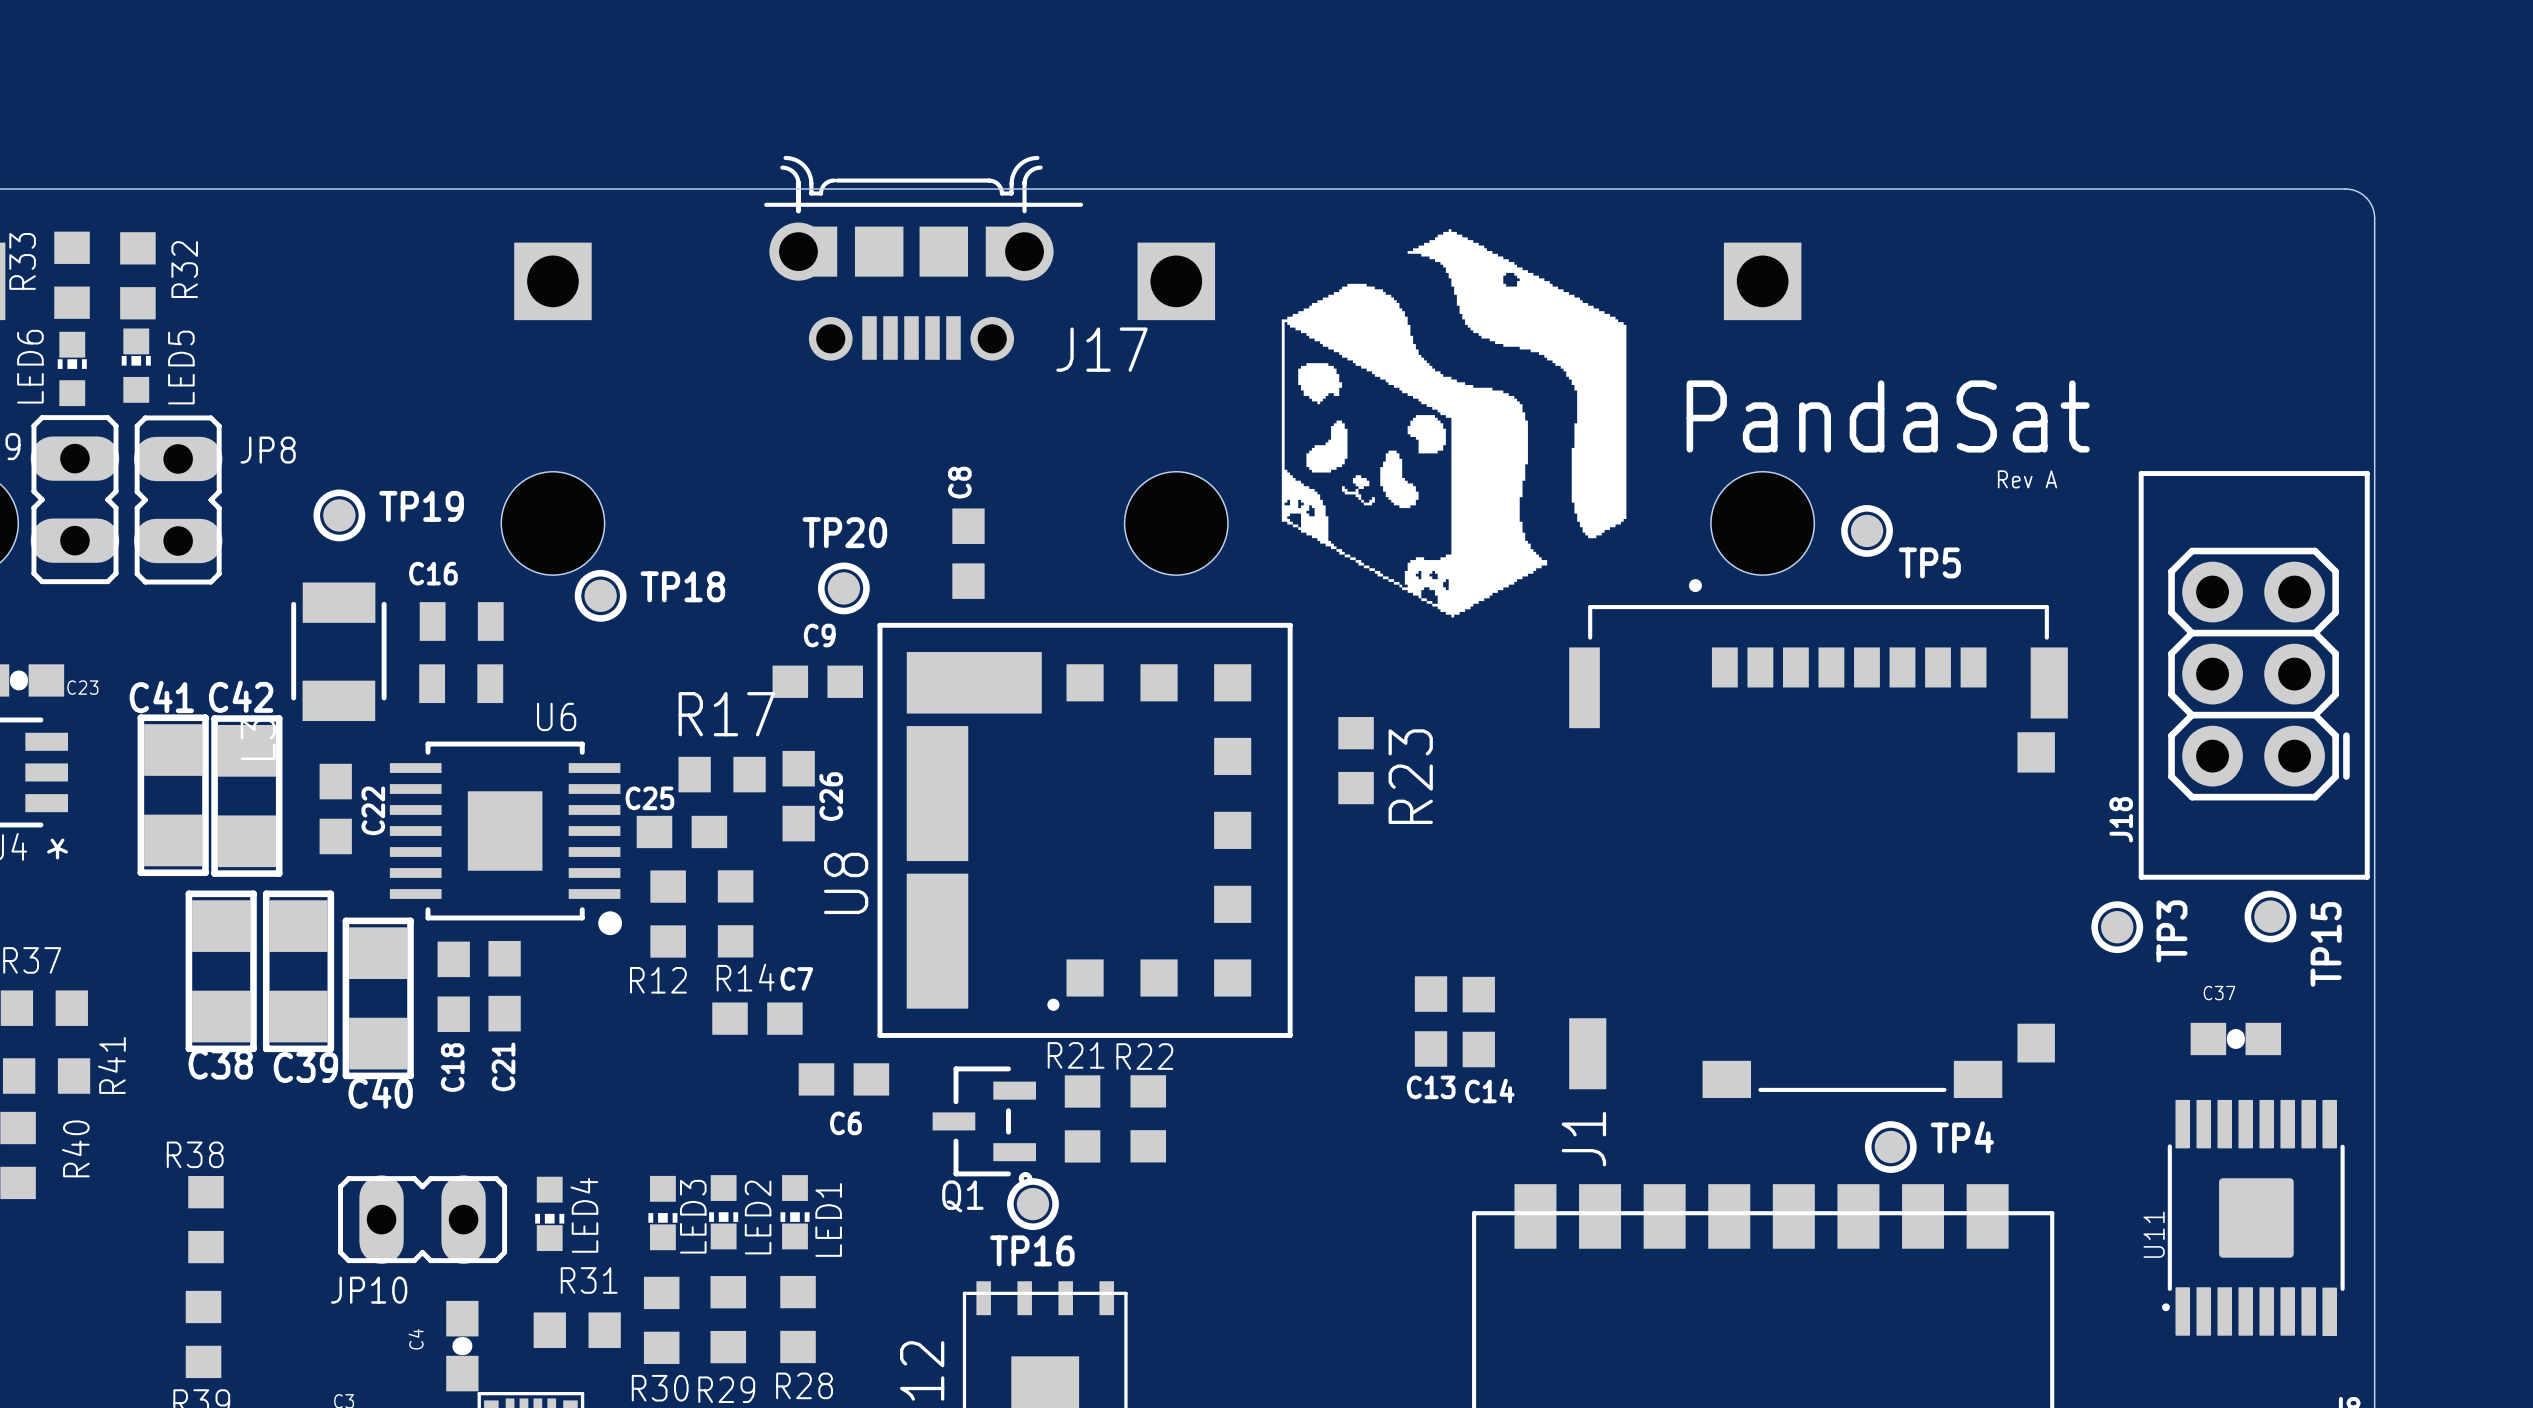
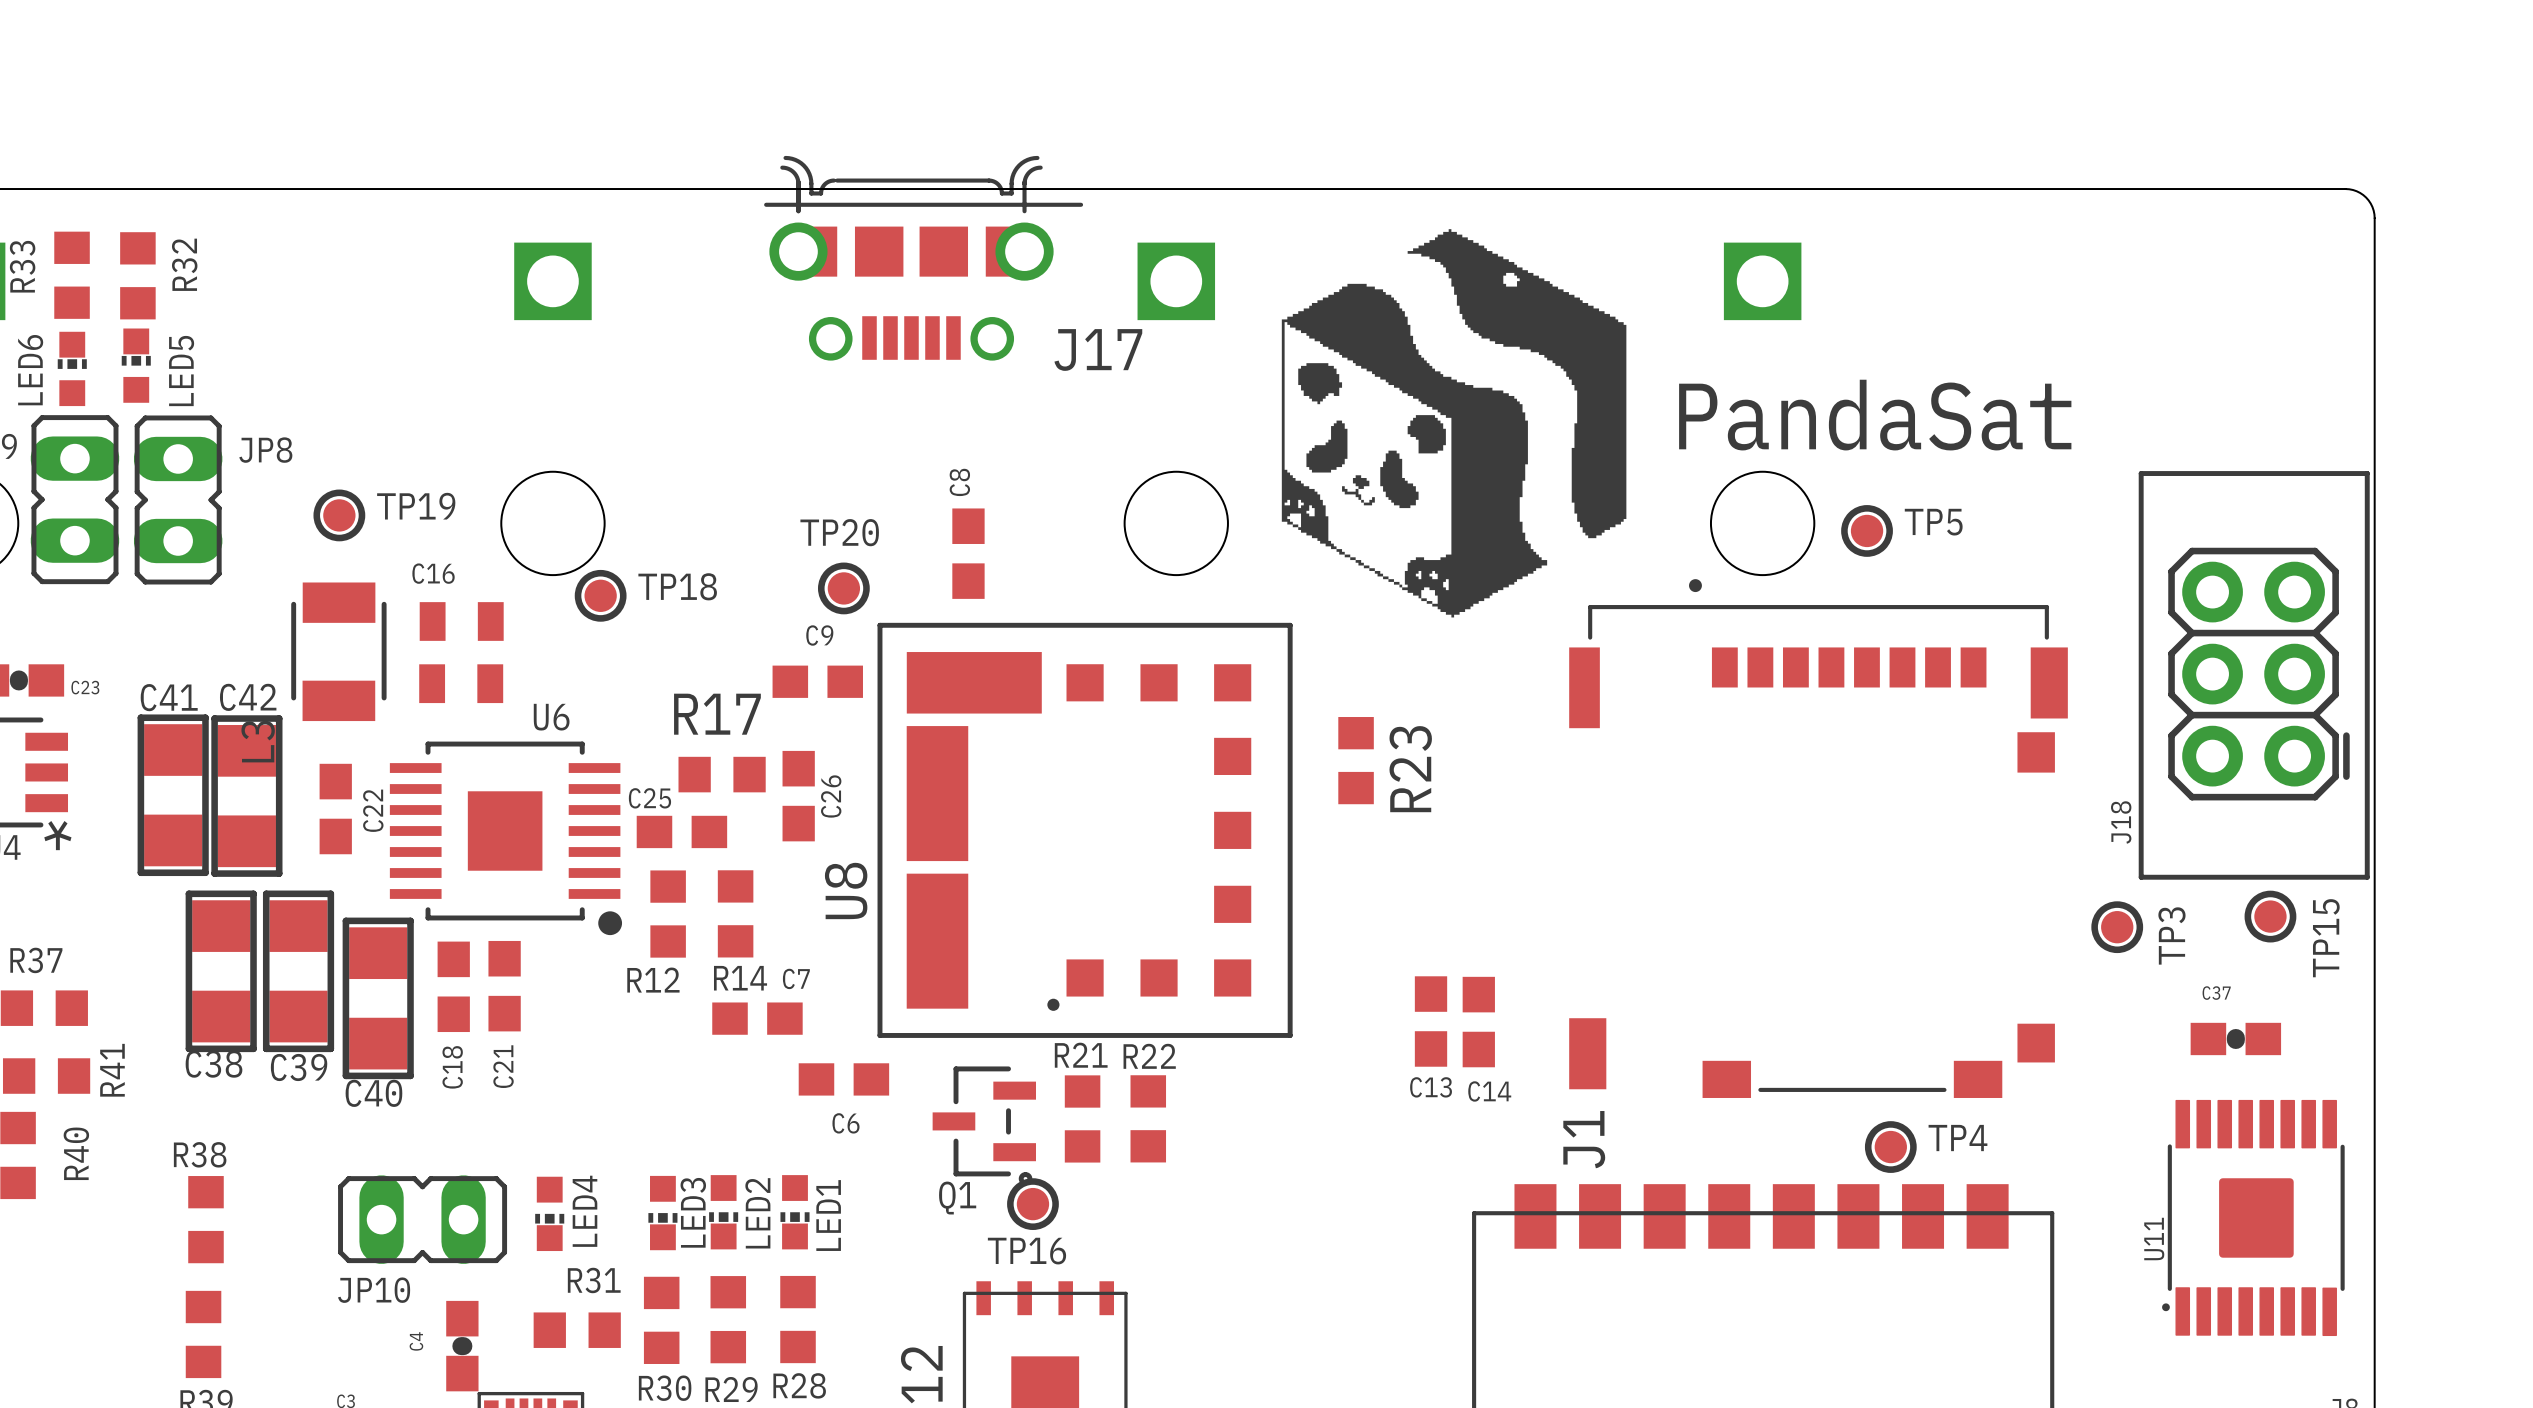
text: Rev A (2027, 479) -> none
TP5 name position: TP5 (1929, 562) -> TP5 (1933, 522)

